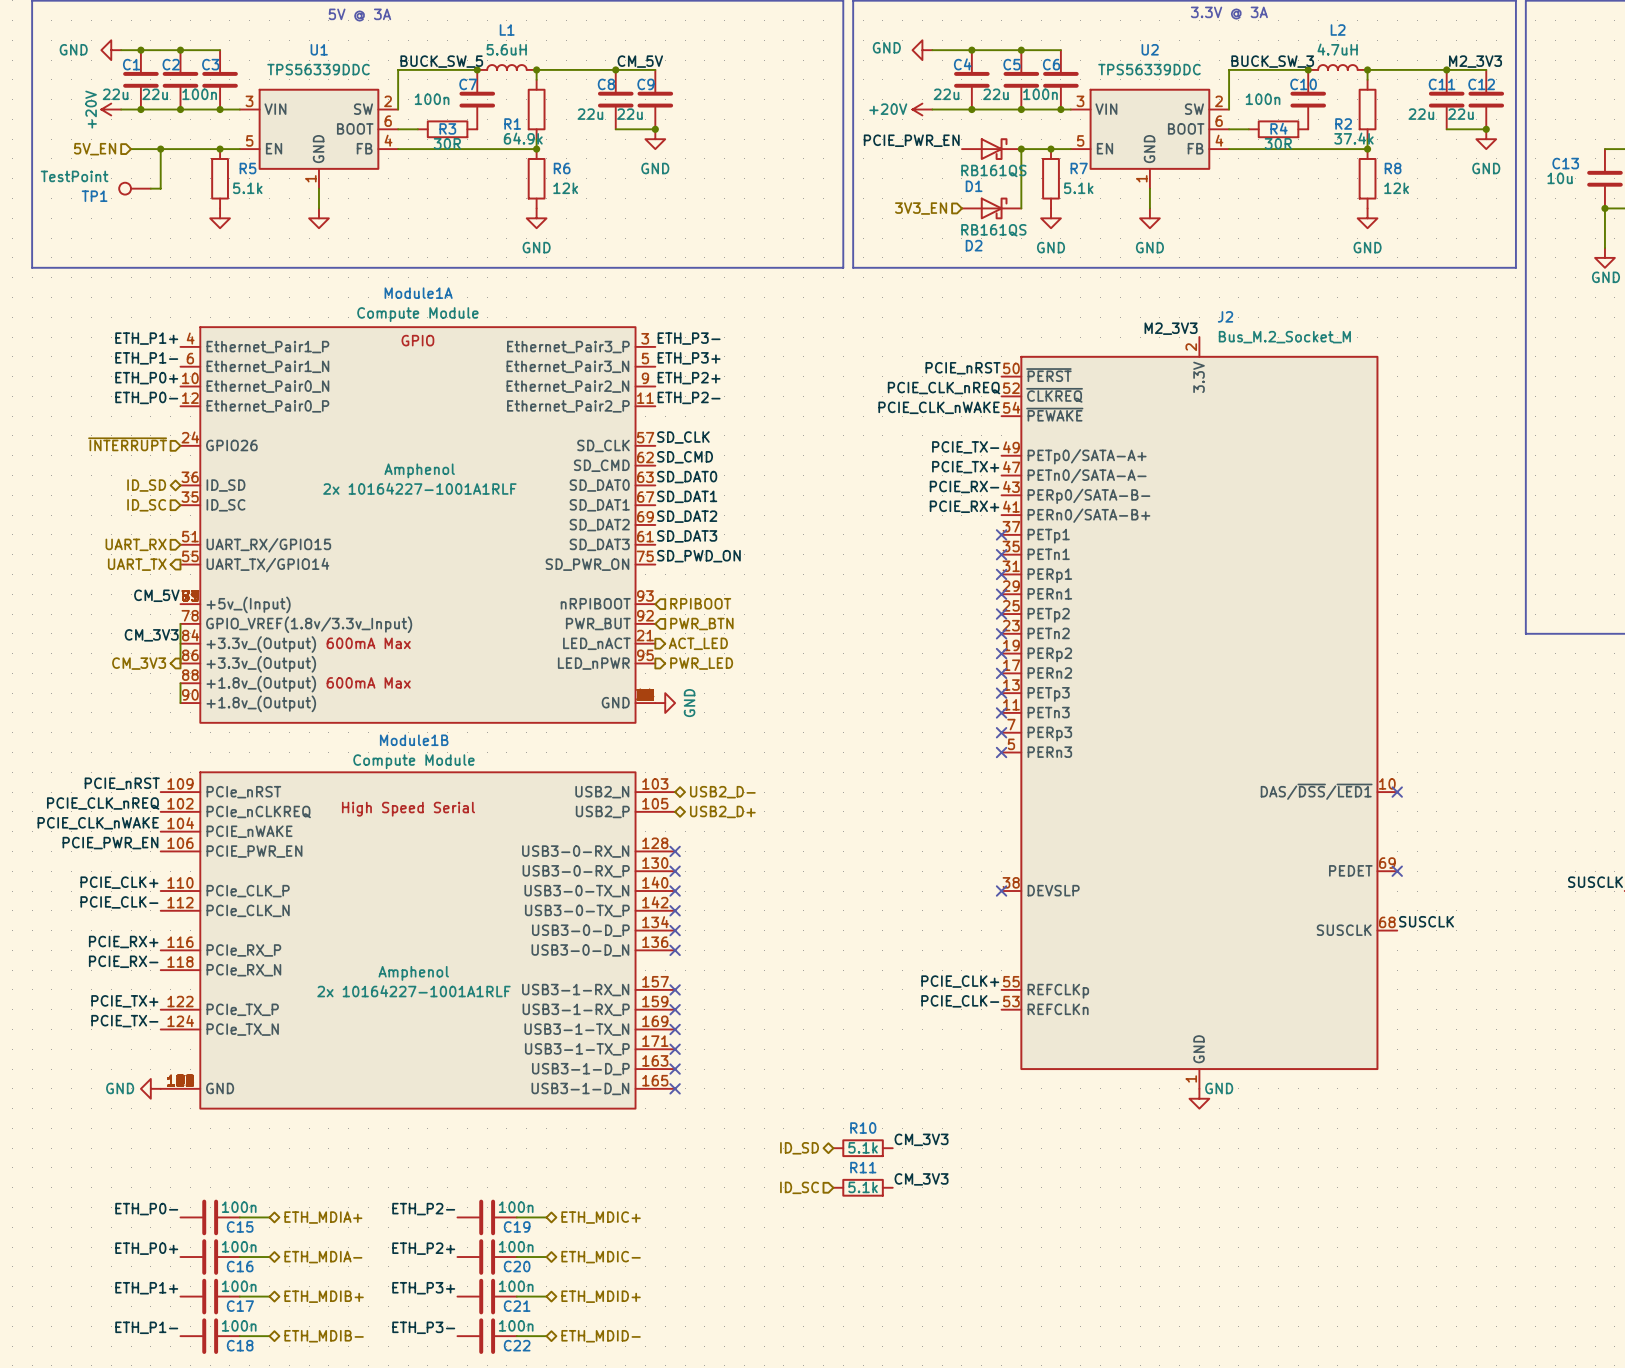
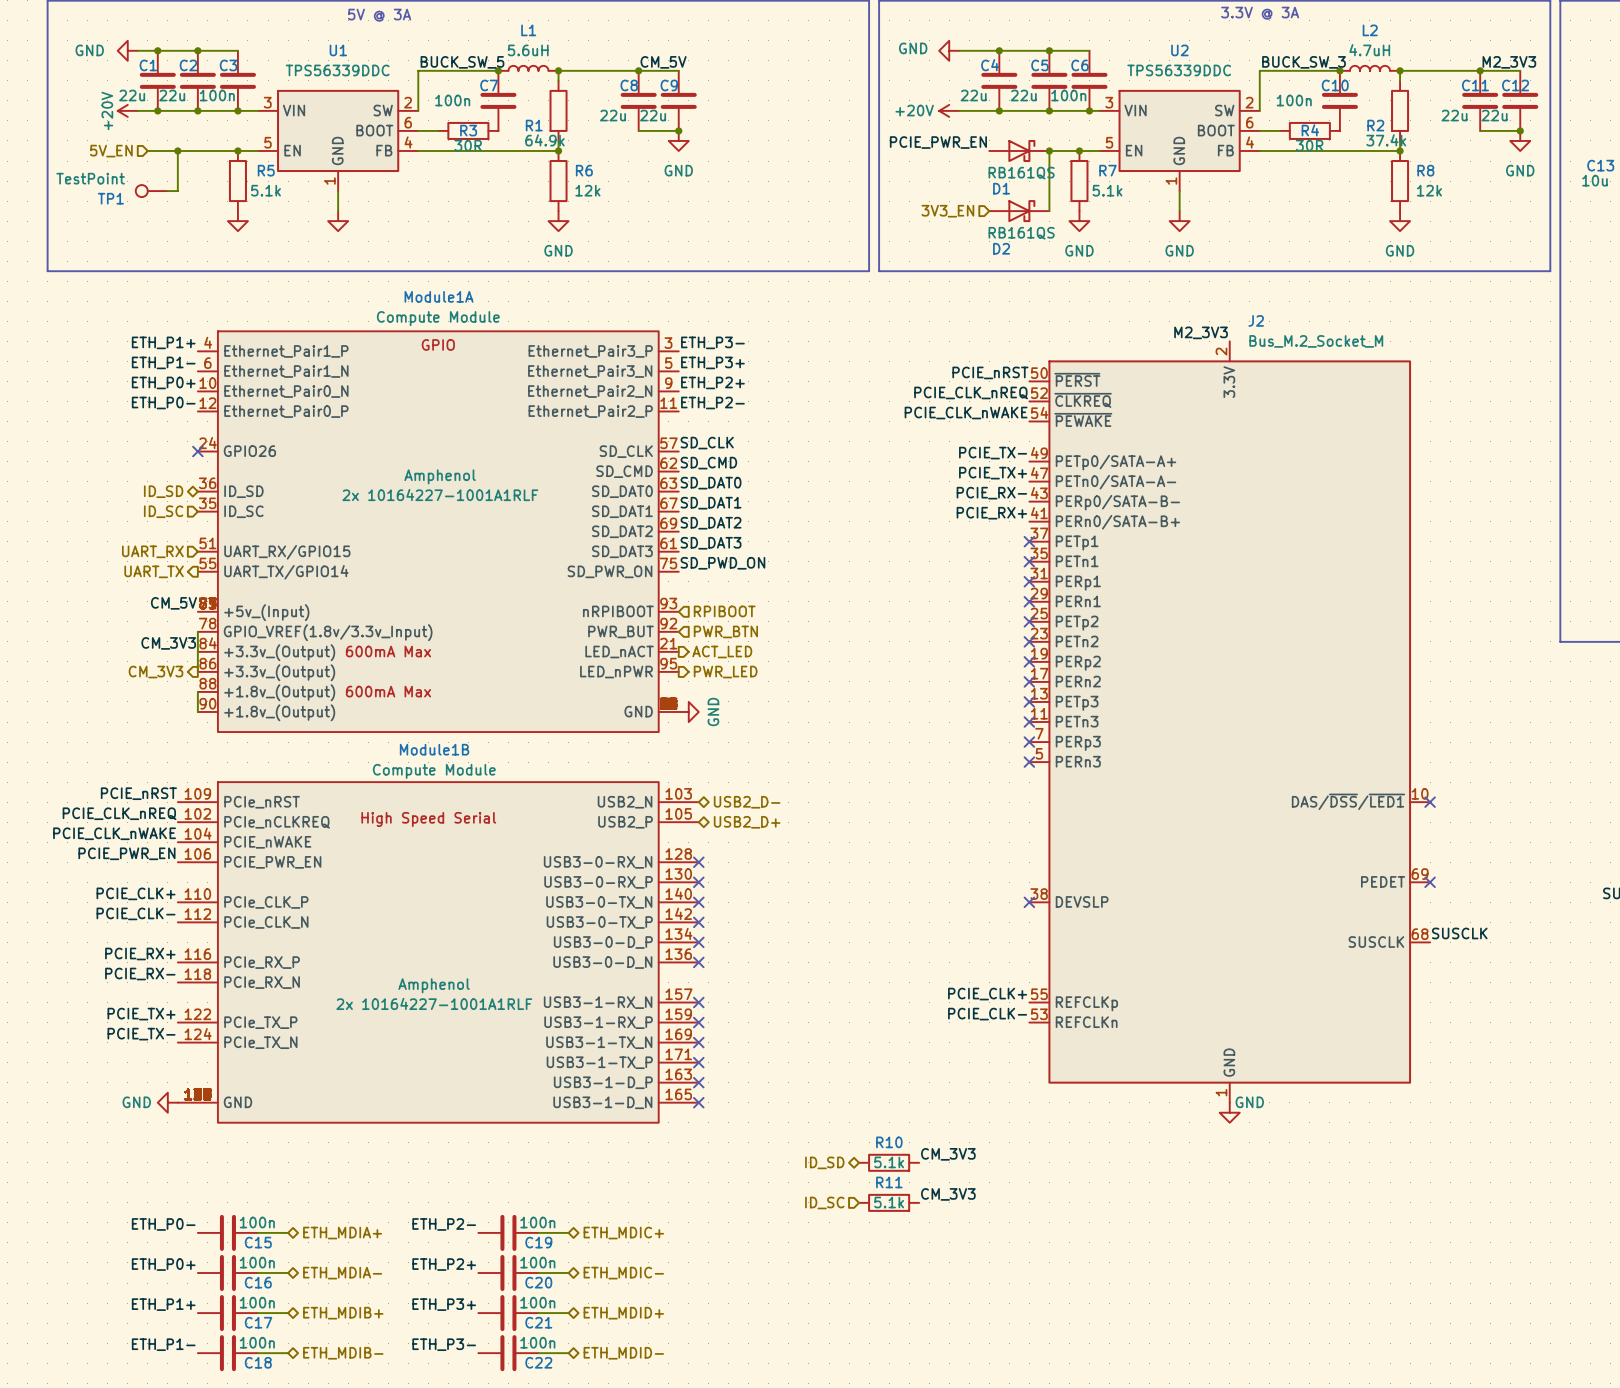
hierarchical label: ~{INTERRUPT} (127, 444) -> none
no-connect mark: none -> (197, 451)

